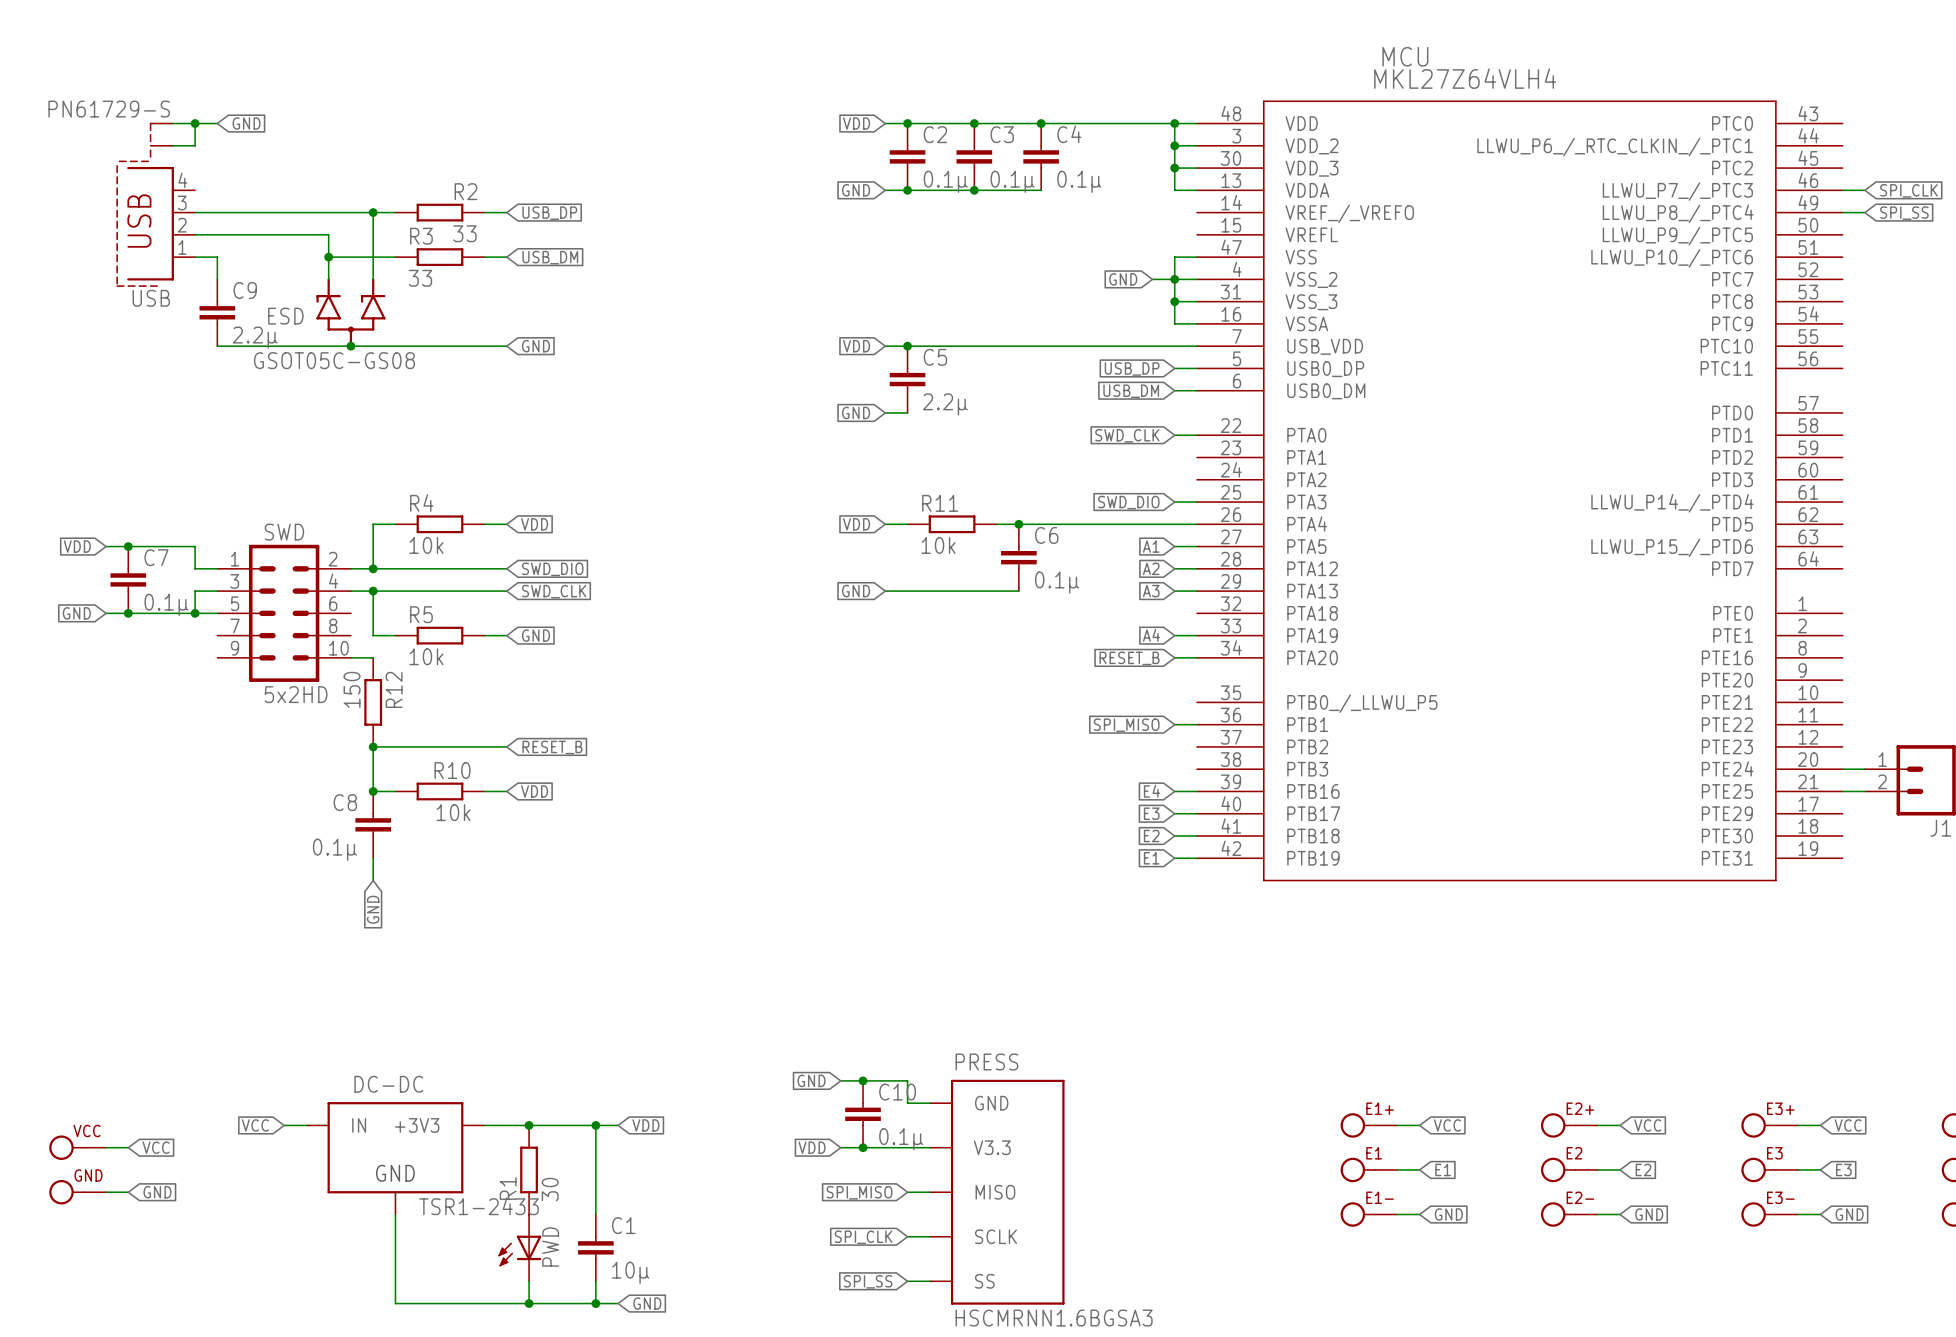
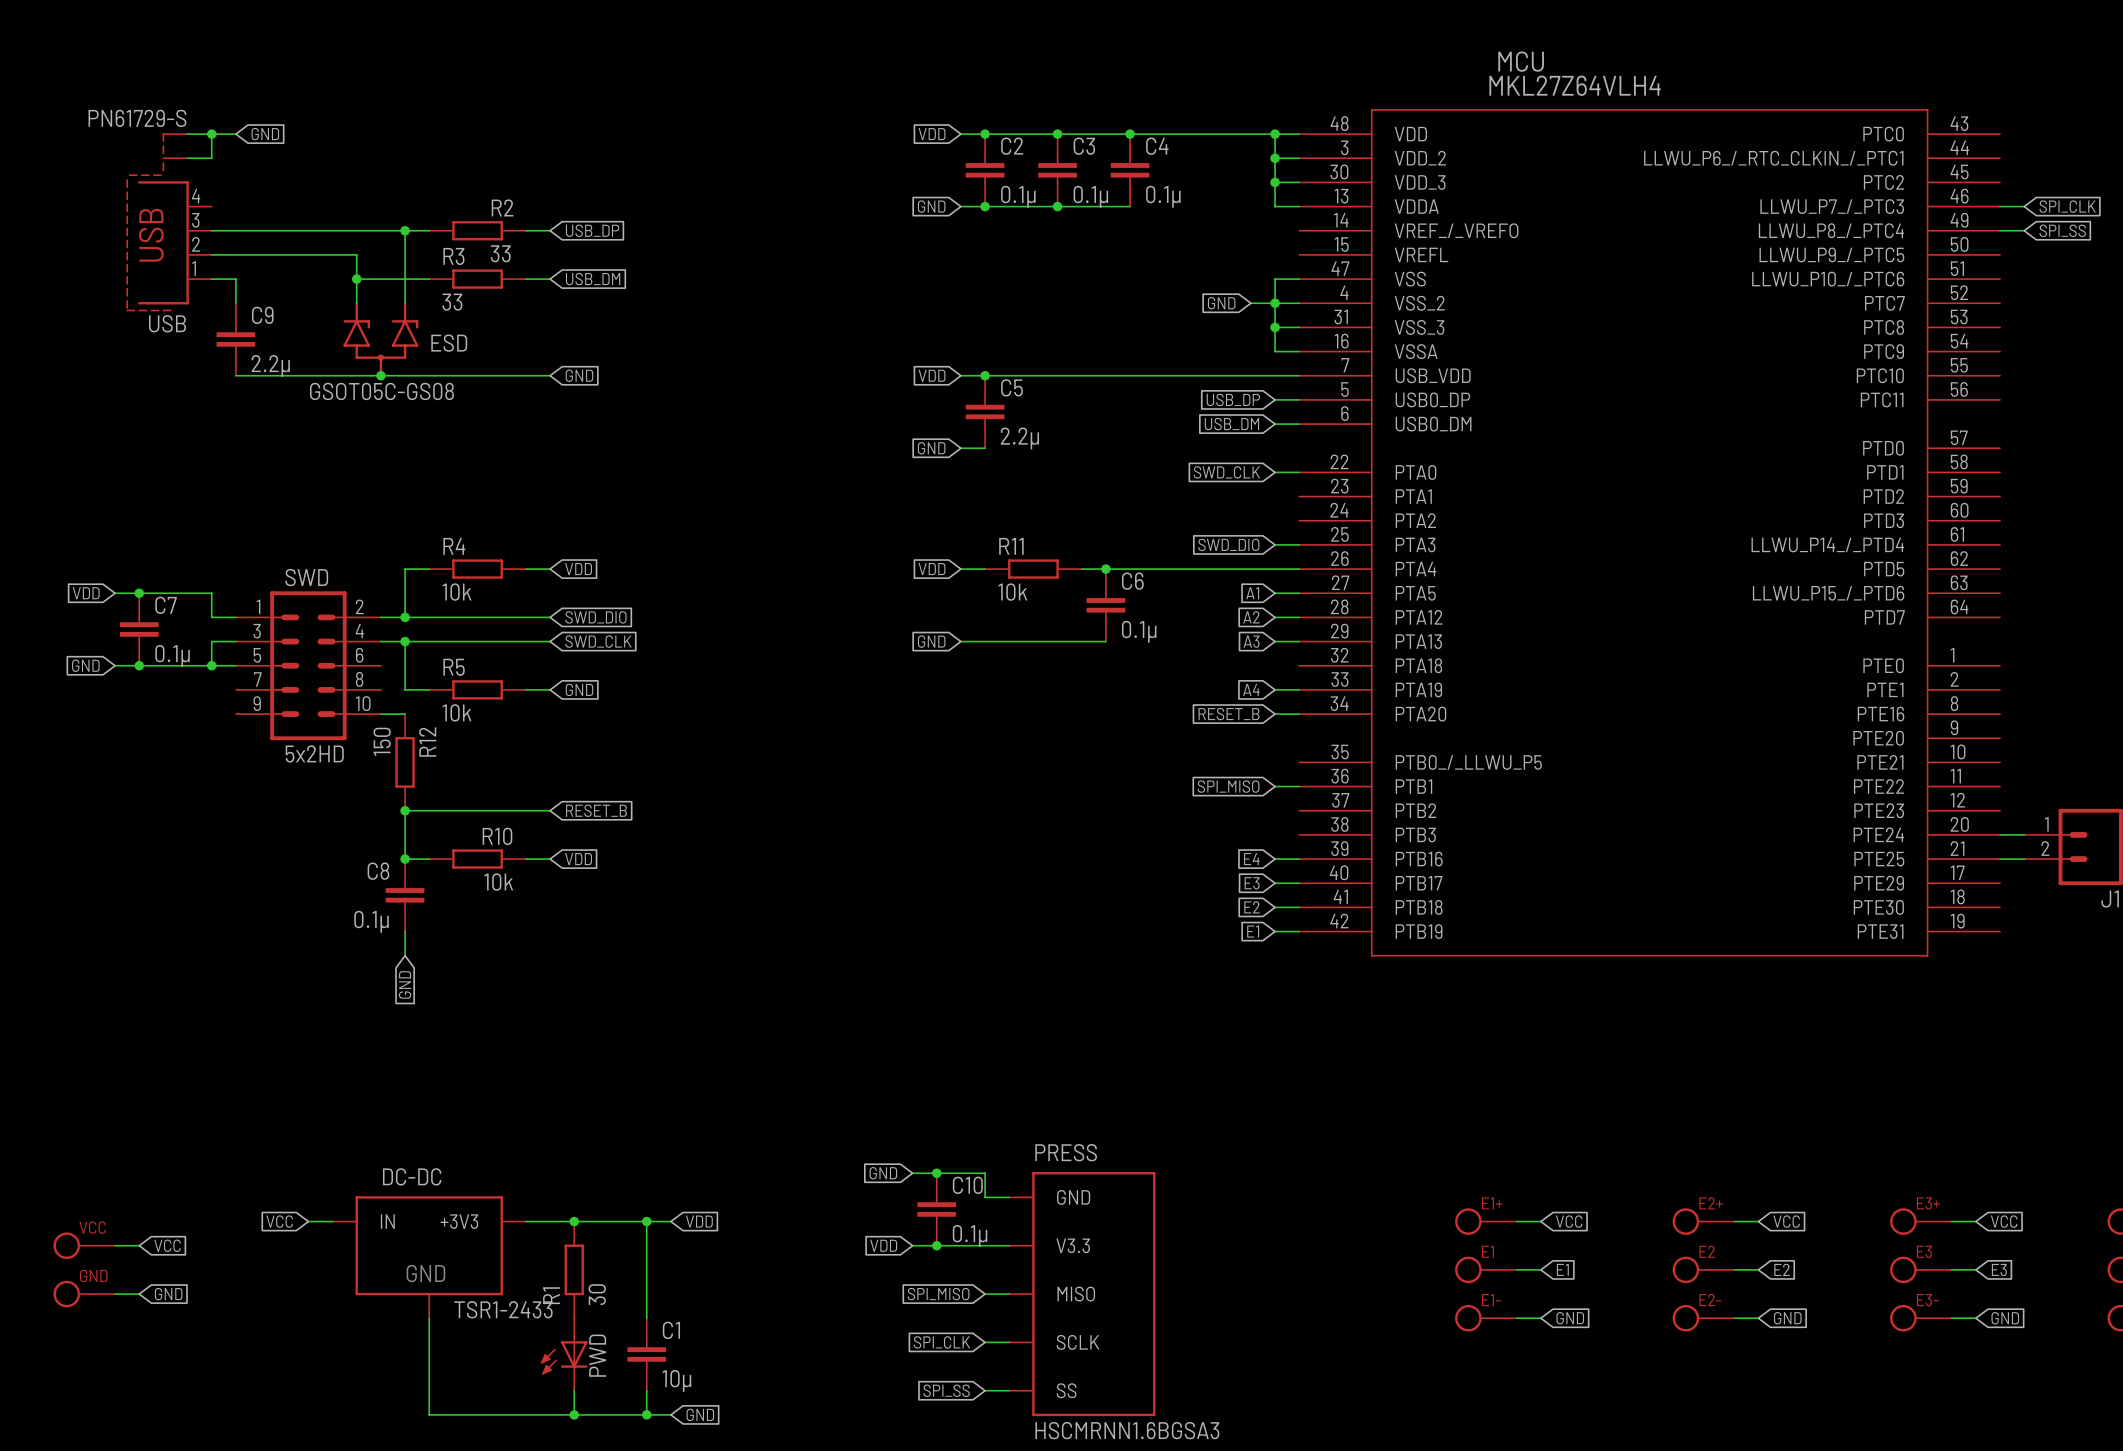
ESD flip: as is (350, 312) -> left-right (380, 339)

